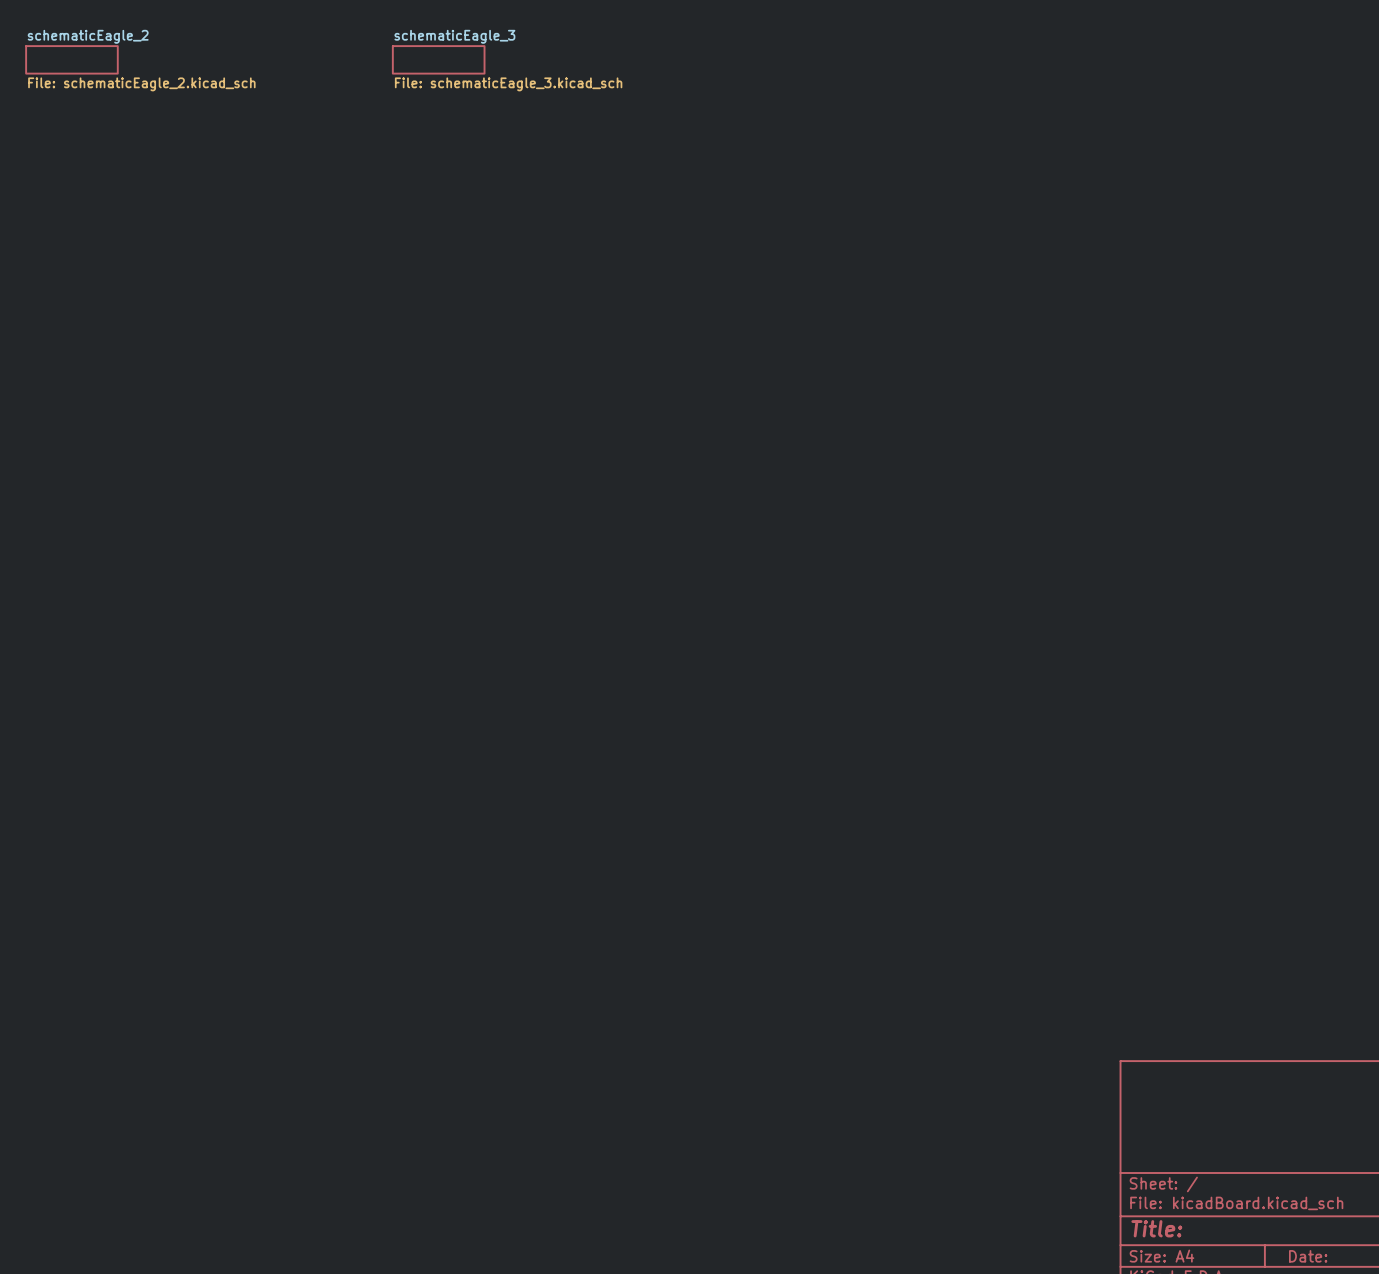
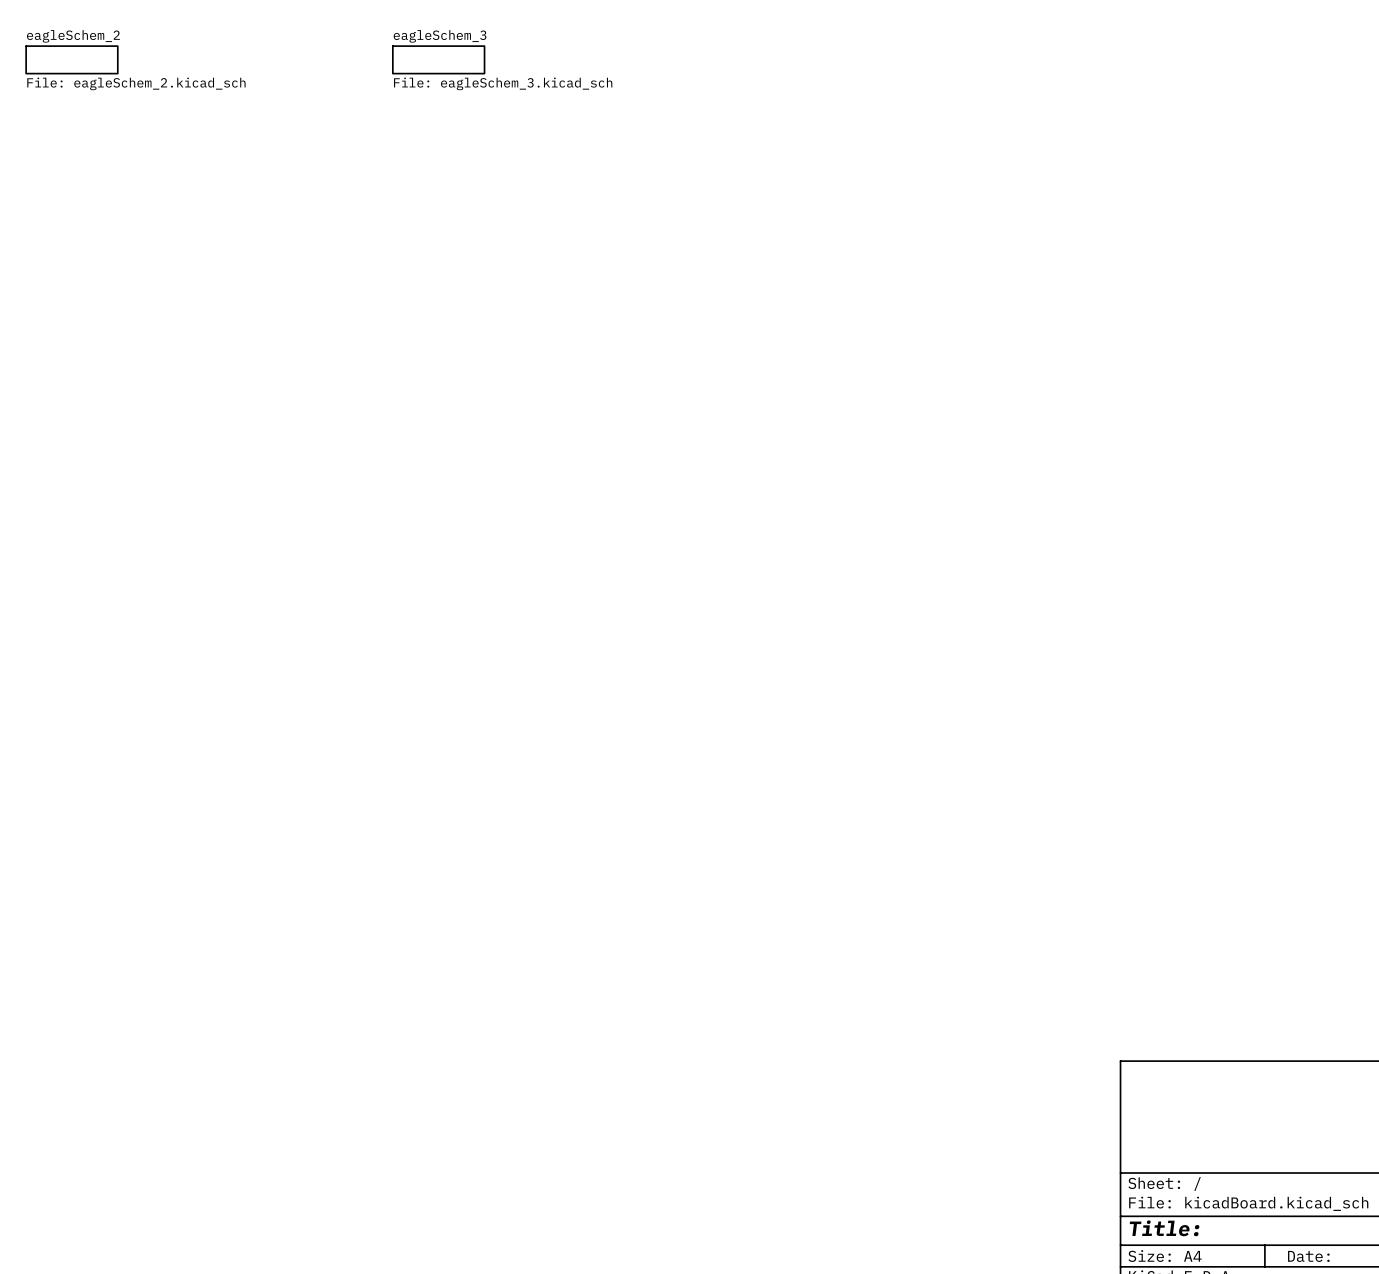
sheet schematicEagle_2 name: schematicEagle_2 (88, 36) -> eagleSchem_2 (73, 36)
sheet schematicEagle_3 name: schematicEagle_3 (454, 36) -> eagleSchem_3 (440, 36)
sheet schematicEagle_2 value: File: schematicEagle_2.kicad_sch (141, 84) -> File: eagleSchem_2.kicad_sch (136, 83)
sheet schematicEagle_3 value: File: schematicEagle_3.kicad_sch (508, 84) -> File: eagleSchem_3.kicad_sch (503, 83)

